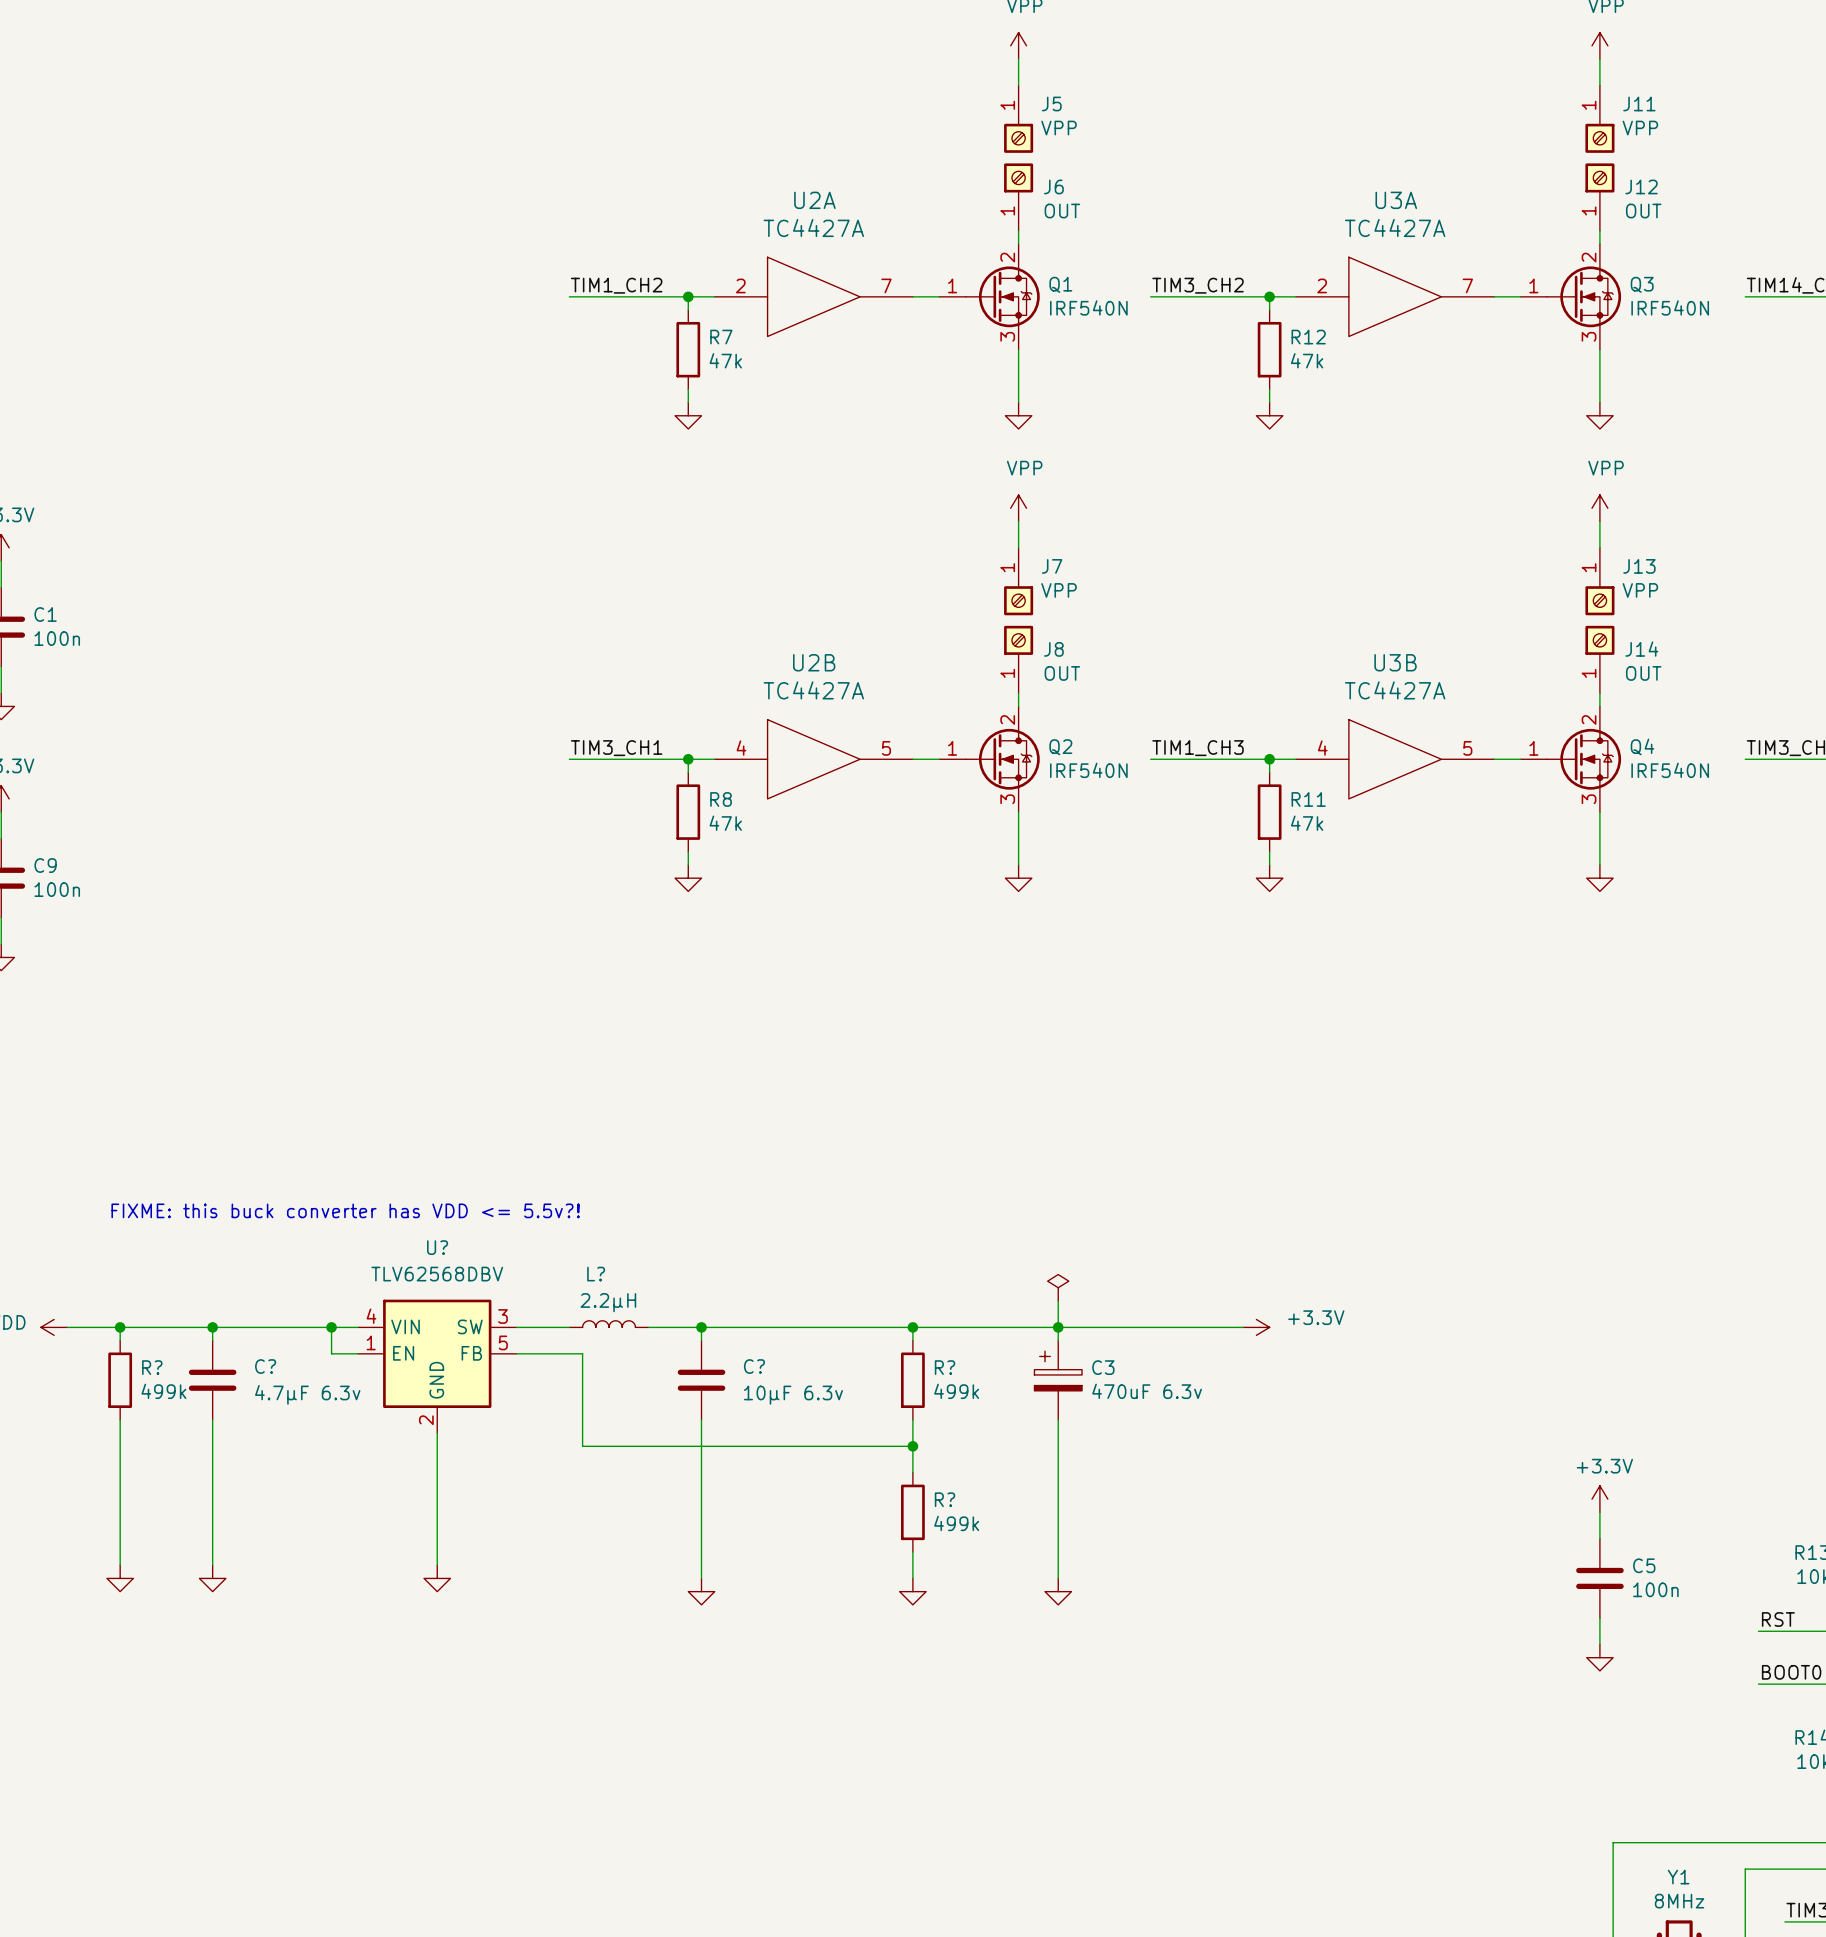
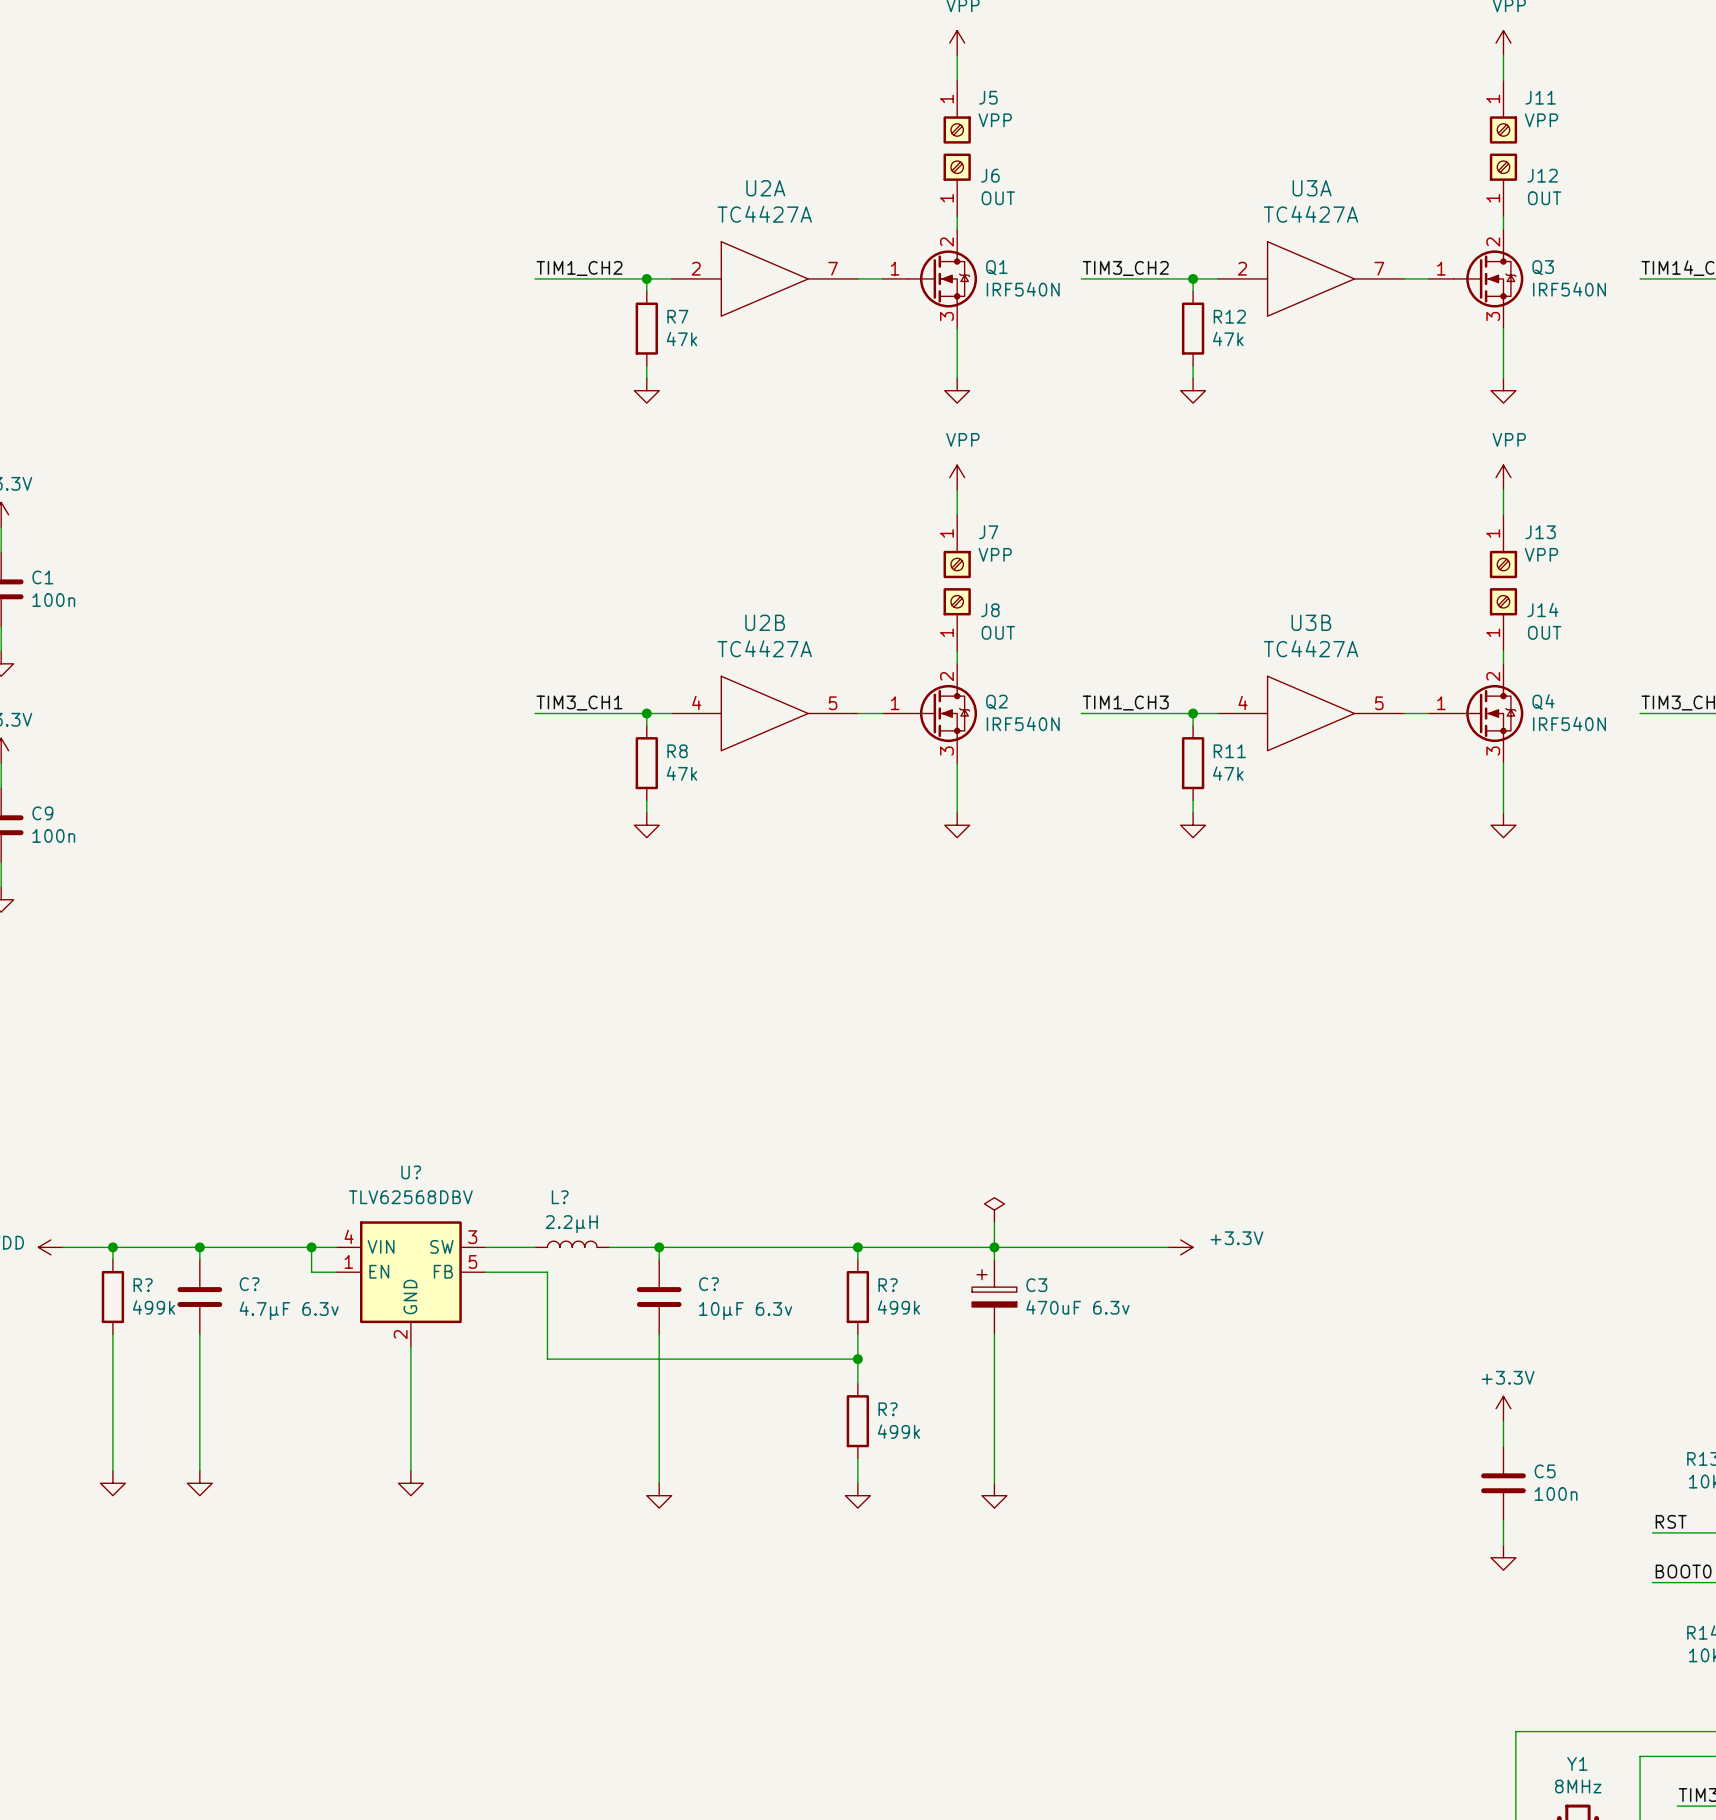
text: FIXME: this buck converter has VDD <= 5.5v?! (345, 1210) -> none

